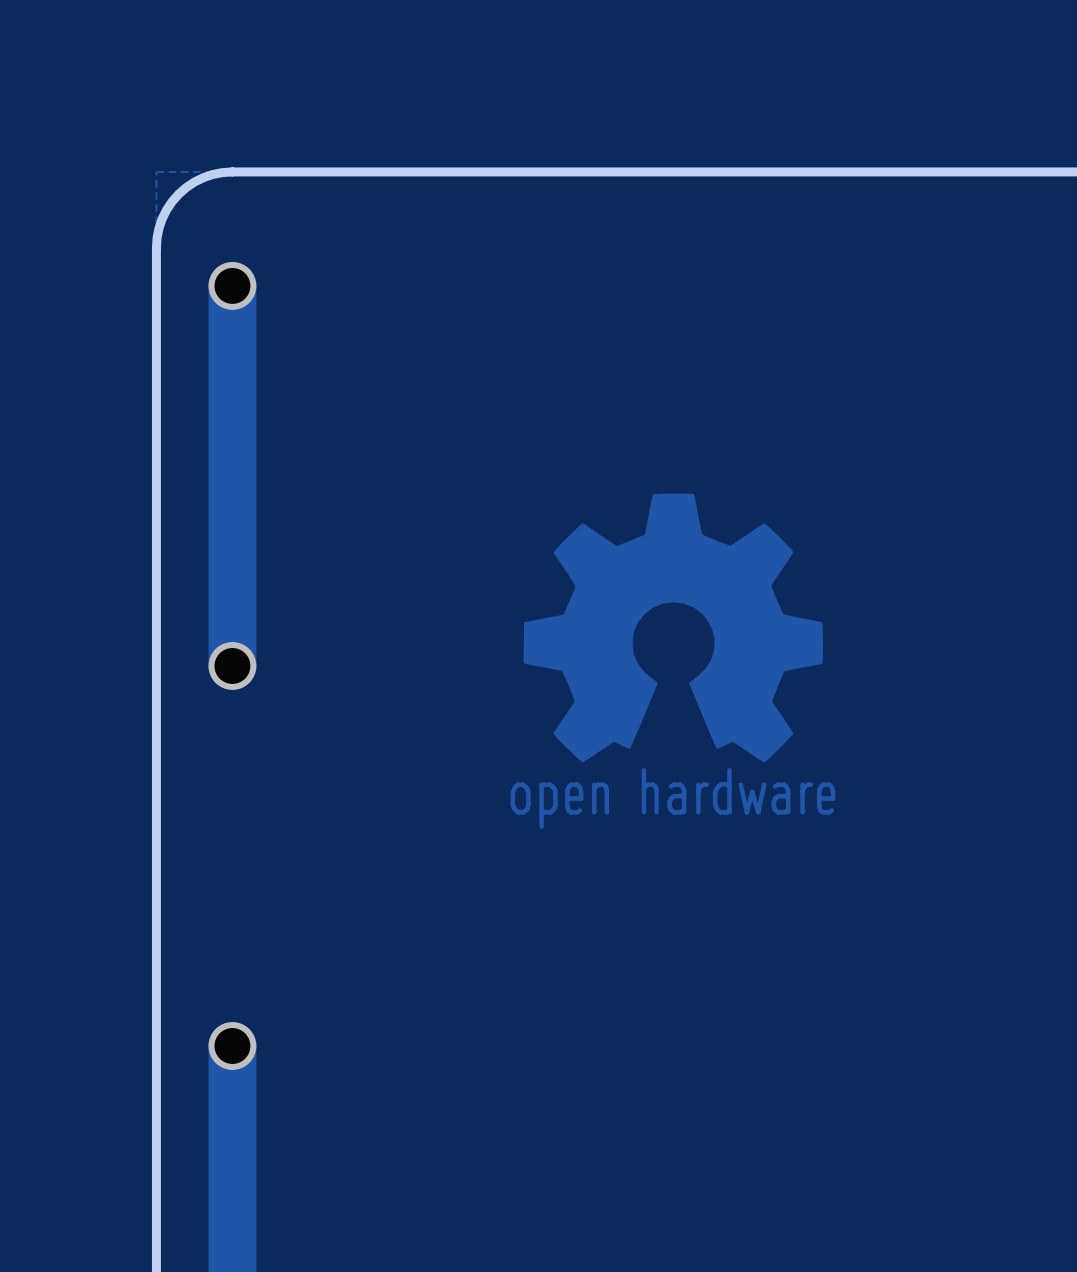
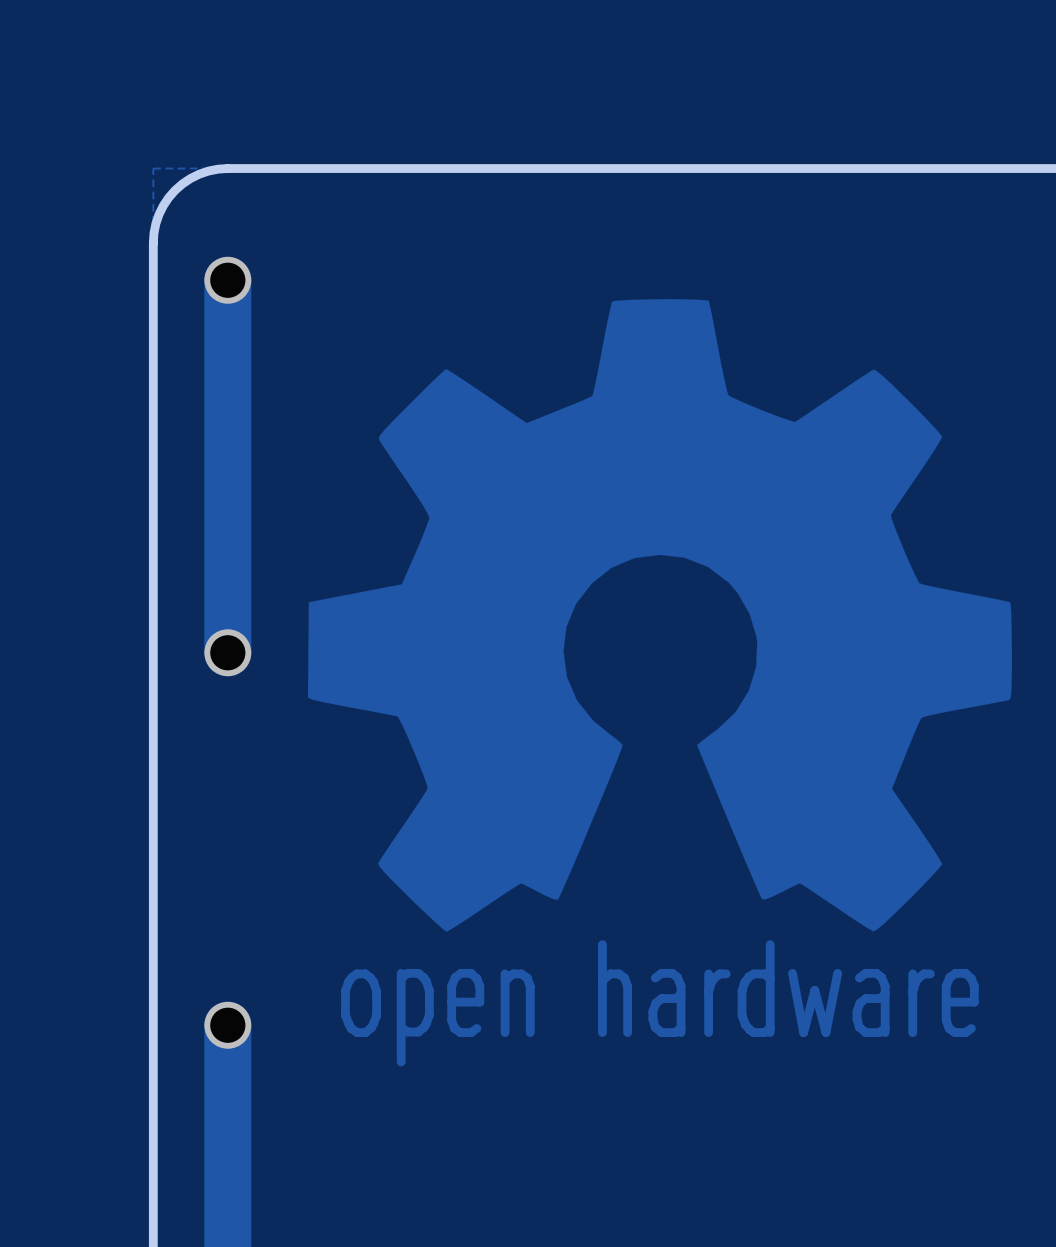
drawing shape: [510, 493, 836, 829] -> [307, 299, 1012, 1067]

